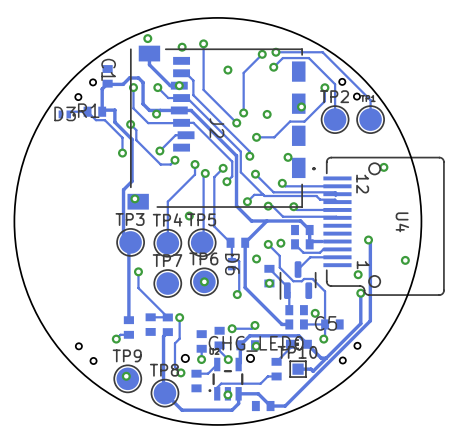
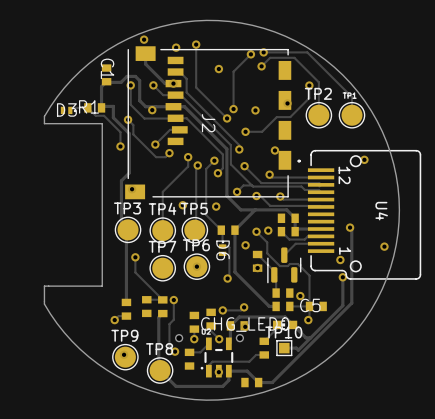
round board edge: [14, 17, 422, 426] -> none
part: (85, 89) -> none
part: (349, 89) -> none
board edge: none -> (44, 116) (64, 87) (89, 63) (117, 44) (160, 26) (206, 20) (241, 23) (274, 31) (306, 46) (334, 67) (358, 92) (377, 121) (390, 153) (399, 198) (397, 233) (390, 267) (377, 299) (358, 328) (334, 353) (295, 379) (263, 392) (229, 399) (194, 399) (160, 393) (117, 376) (98, 364) (72, 341) (44, 304) (44, 286) (102, 286) (102, 123) (44, 123) (44, 116)
via: none -> (216, 206)
part: (86, 353) -> none
part: (350, 353) -> none

